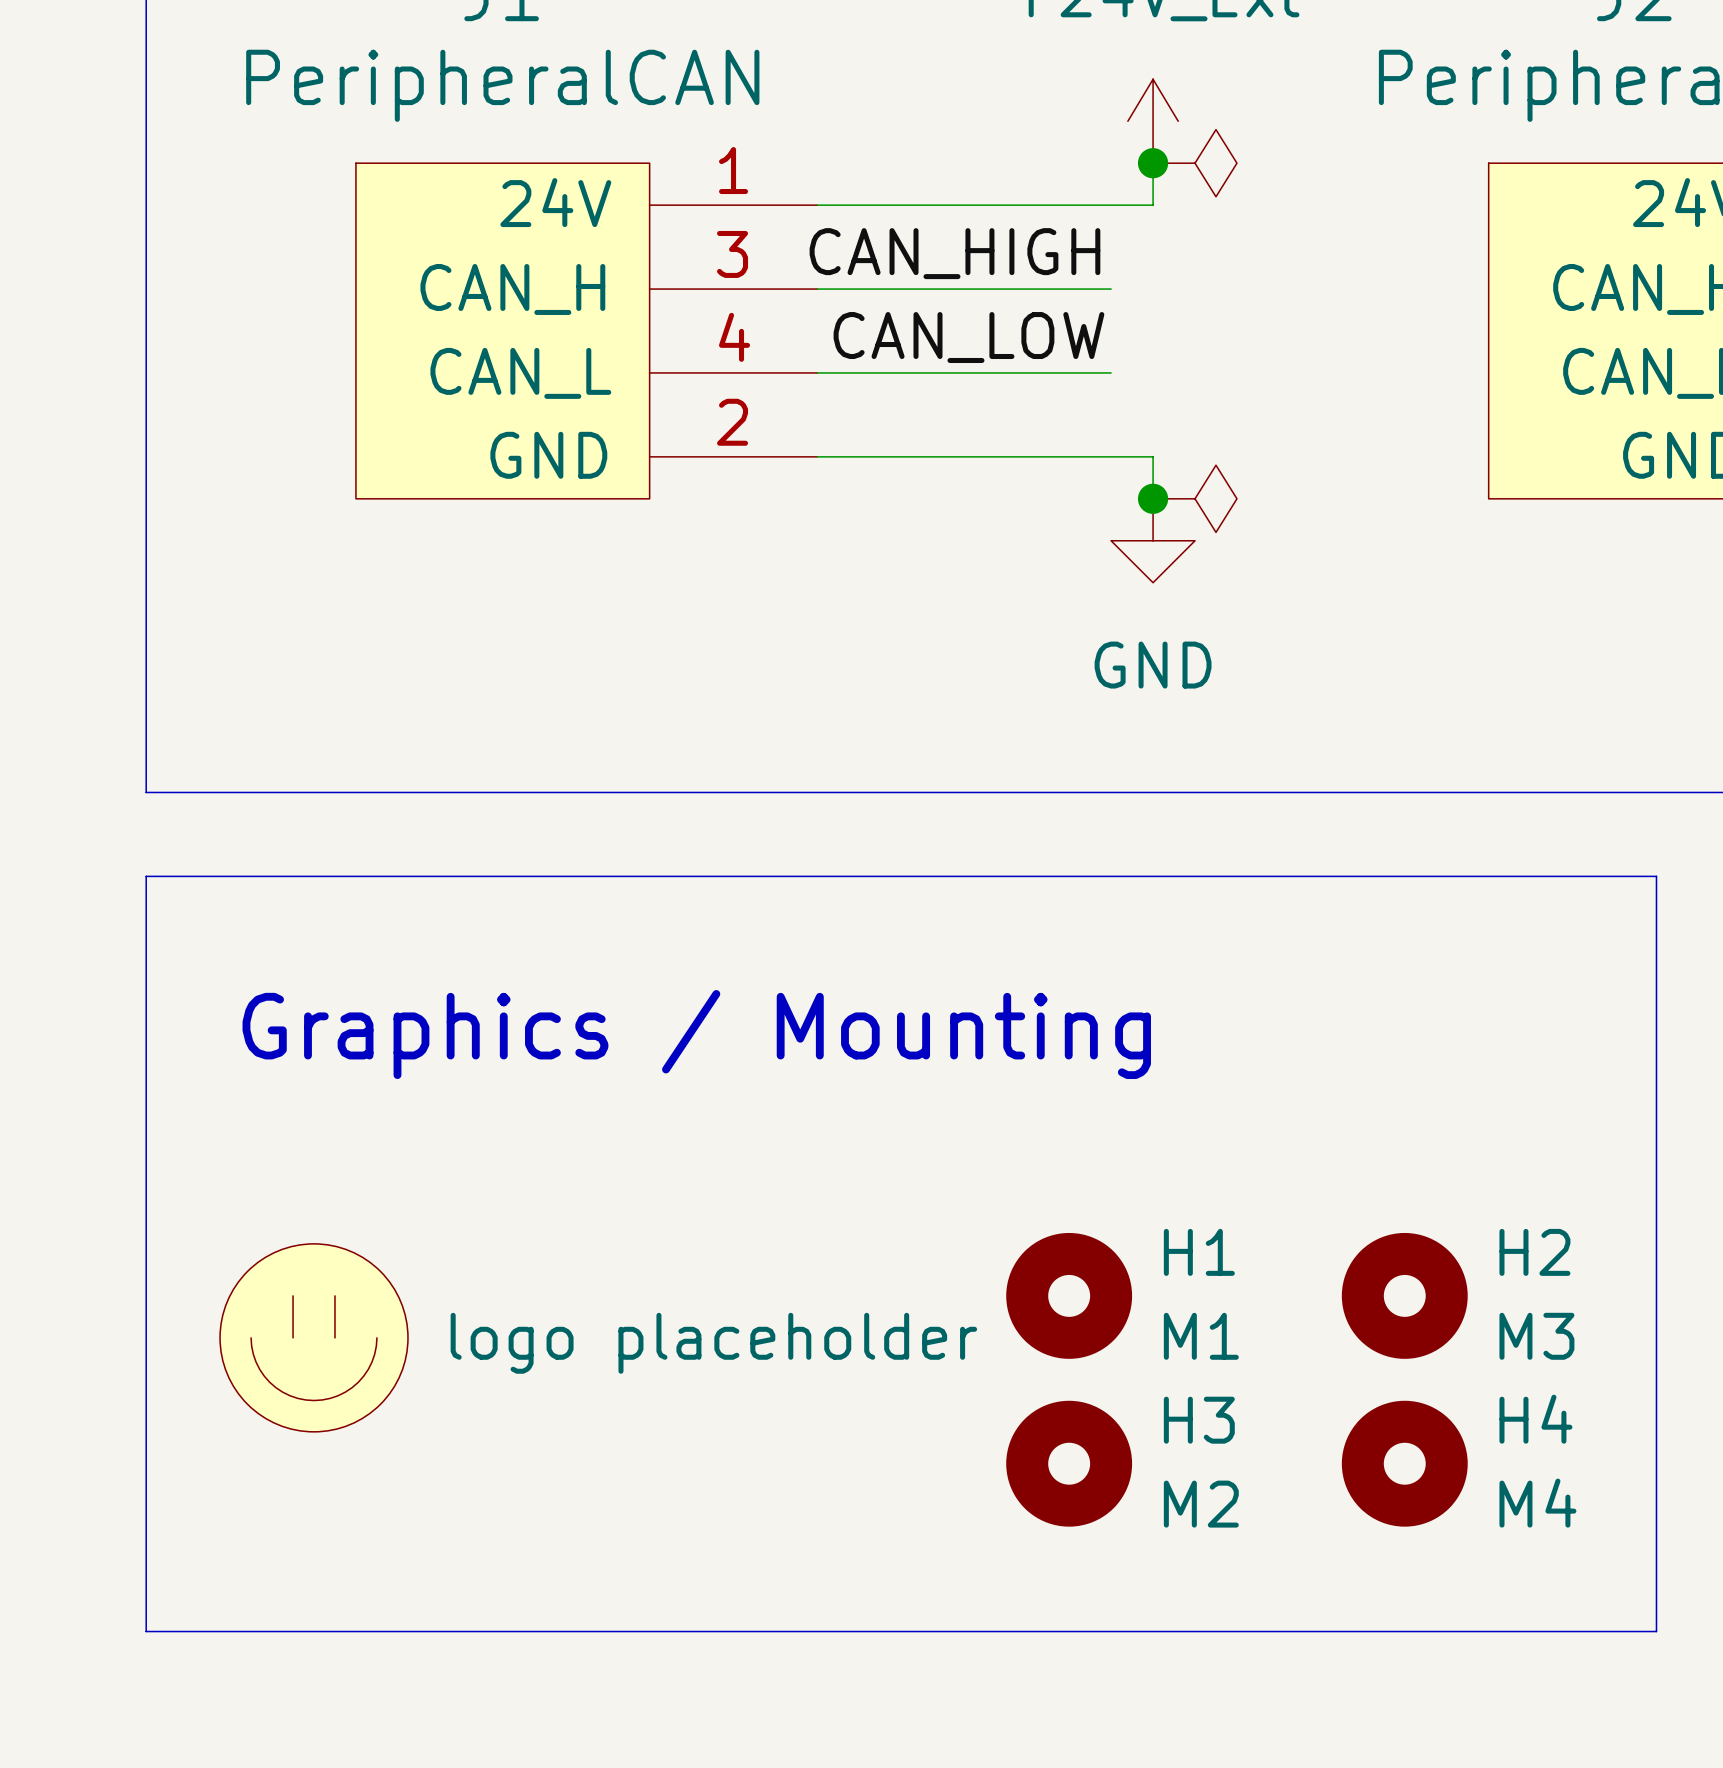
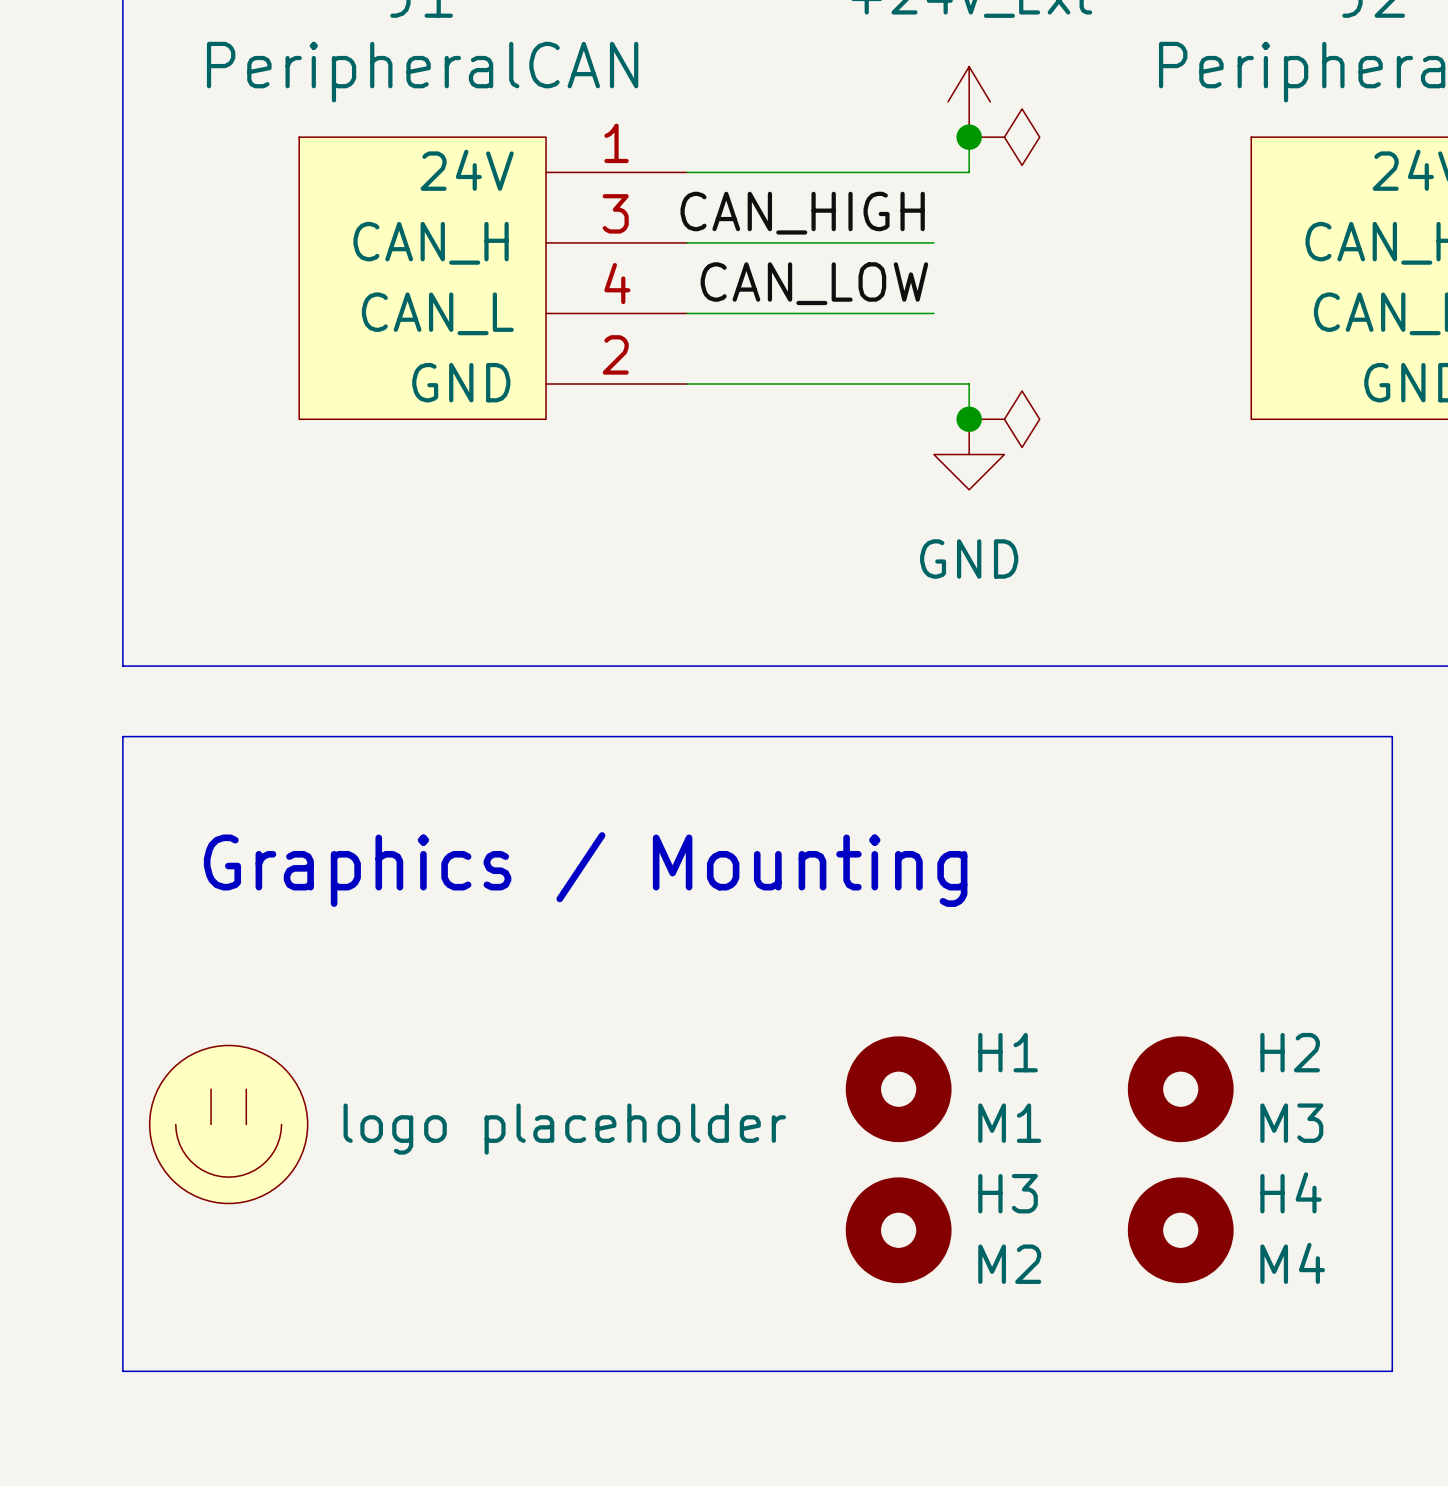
part position: (314, 1337) -> (228, 1124)

